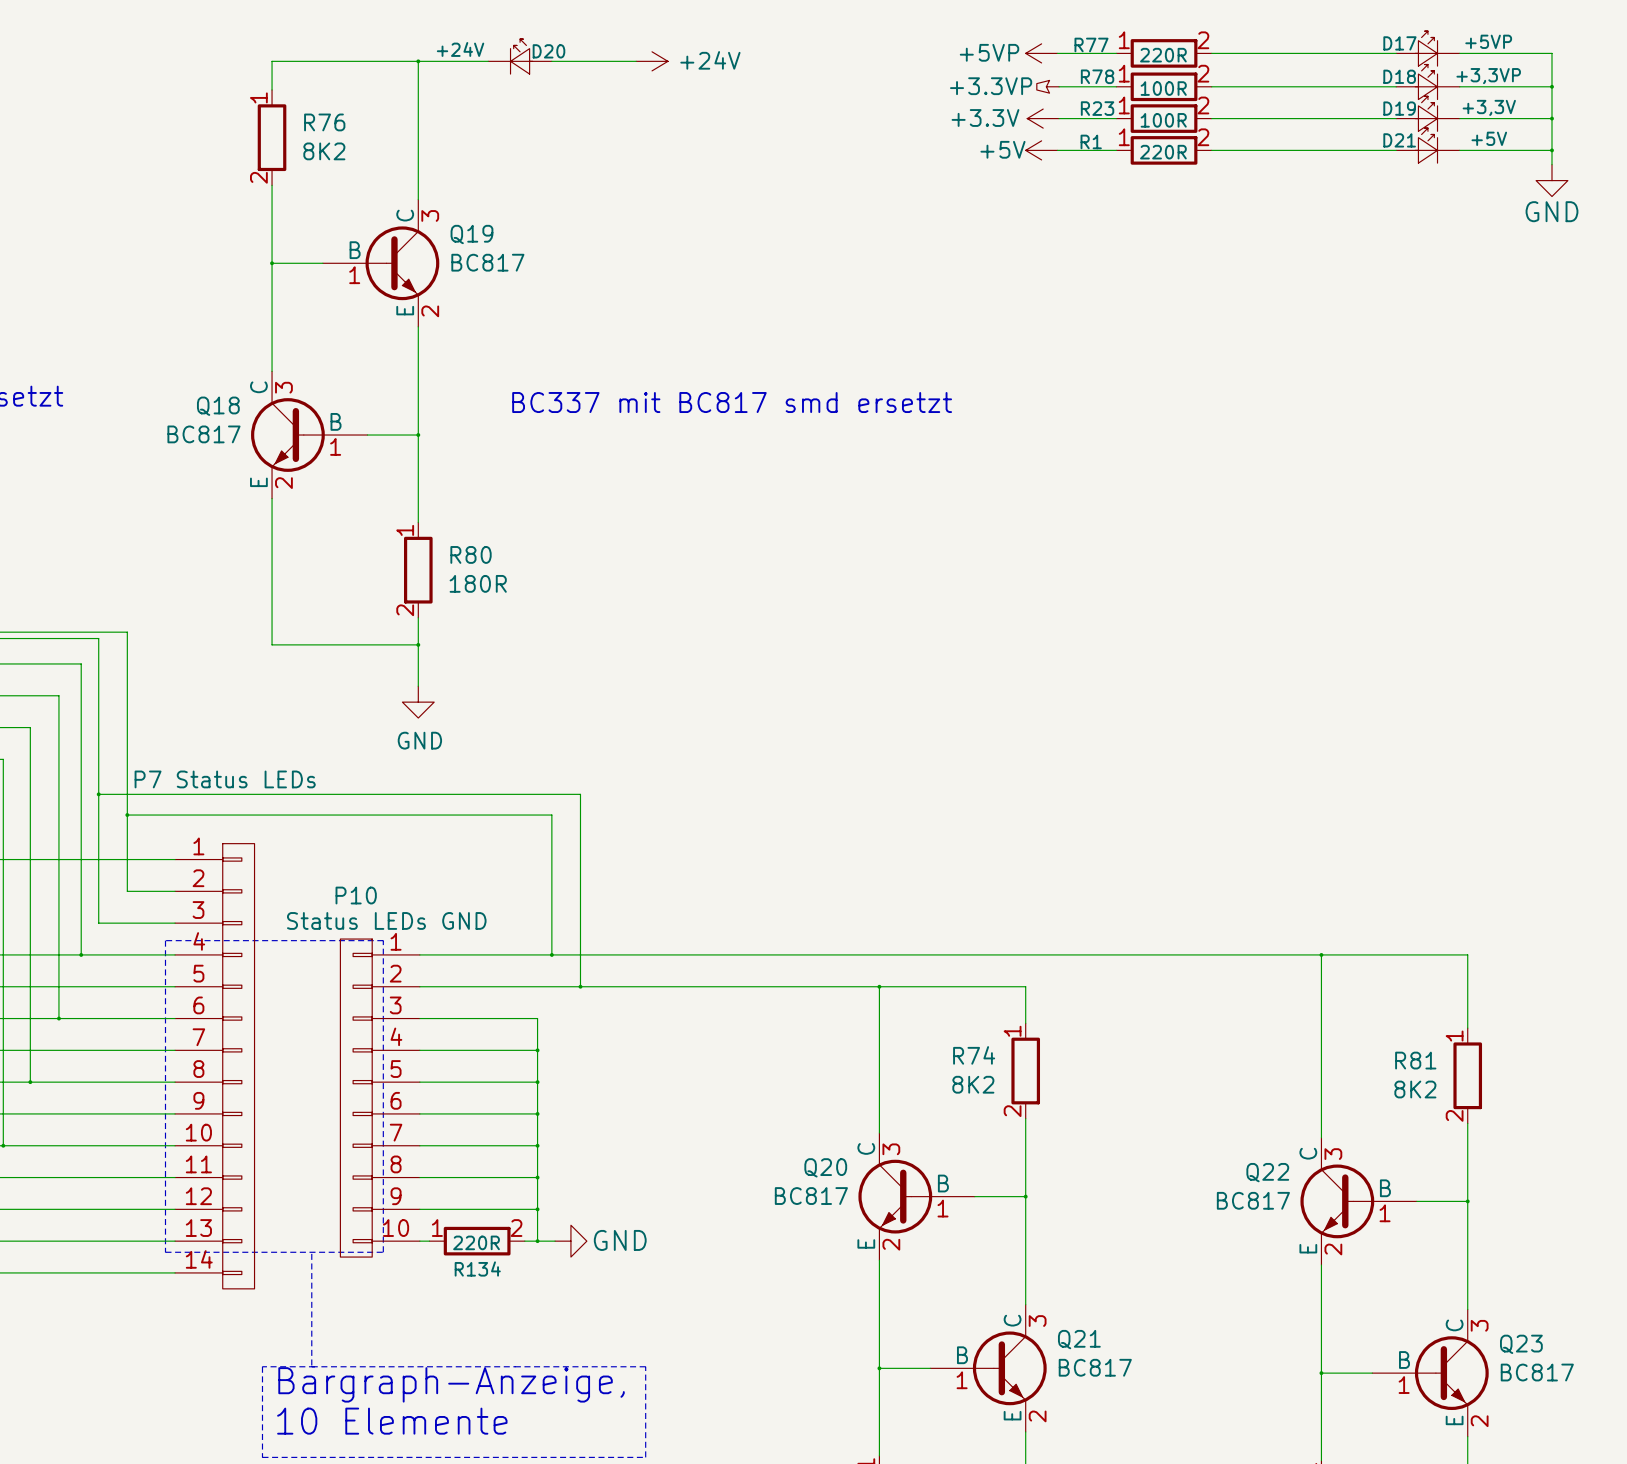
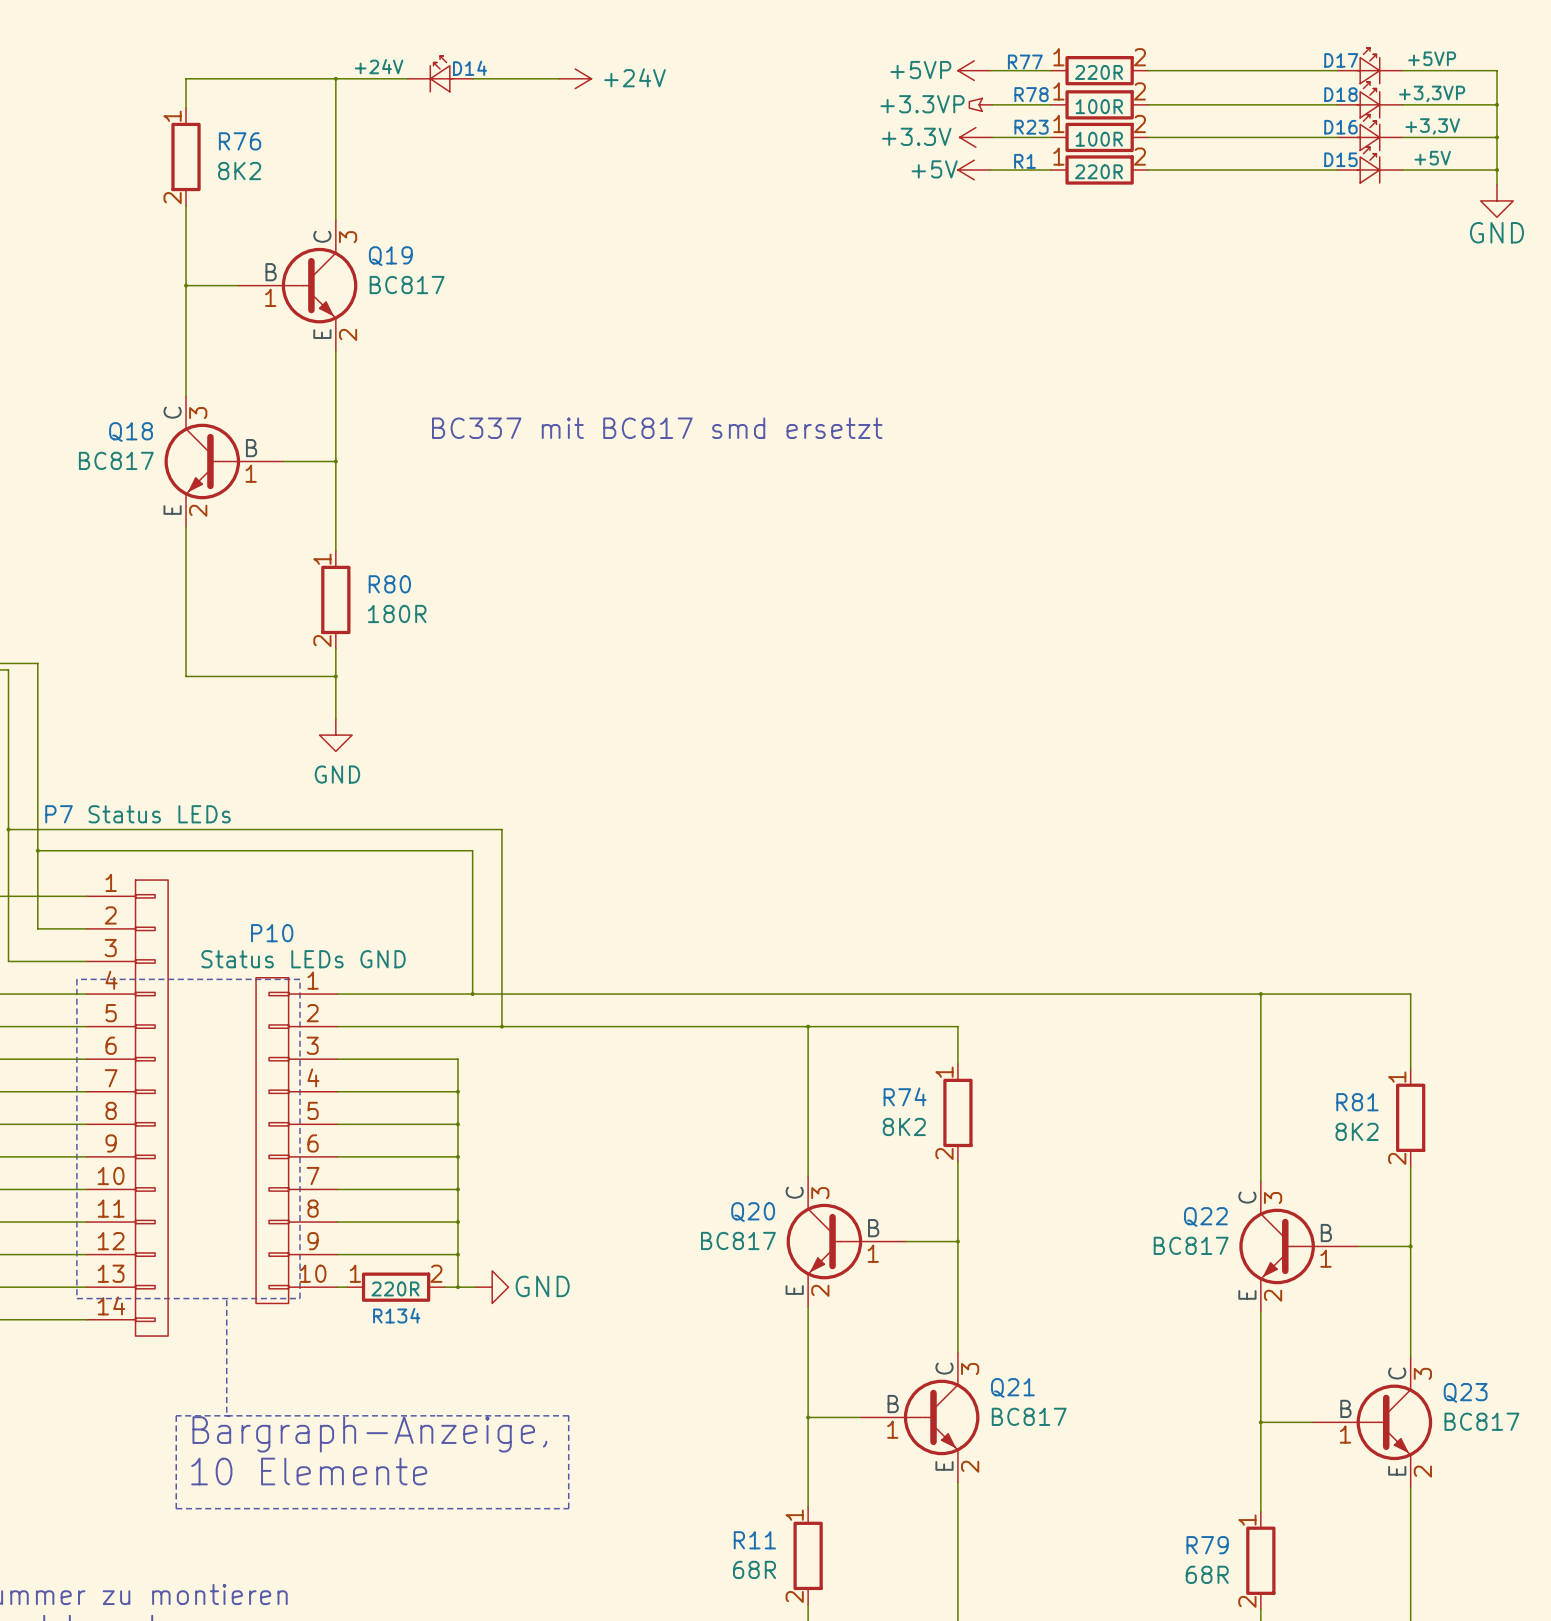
D20 name: D20 (548, 51) -> D14 (469, 68)
D19 name: D19 (1399, 108) -> D16 (1340, 127)
D21 name: D21 (1399, 140) -> D15 (1340, 159)

